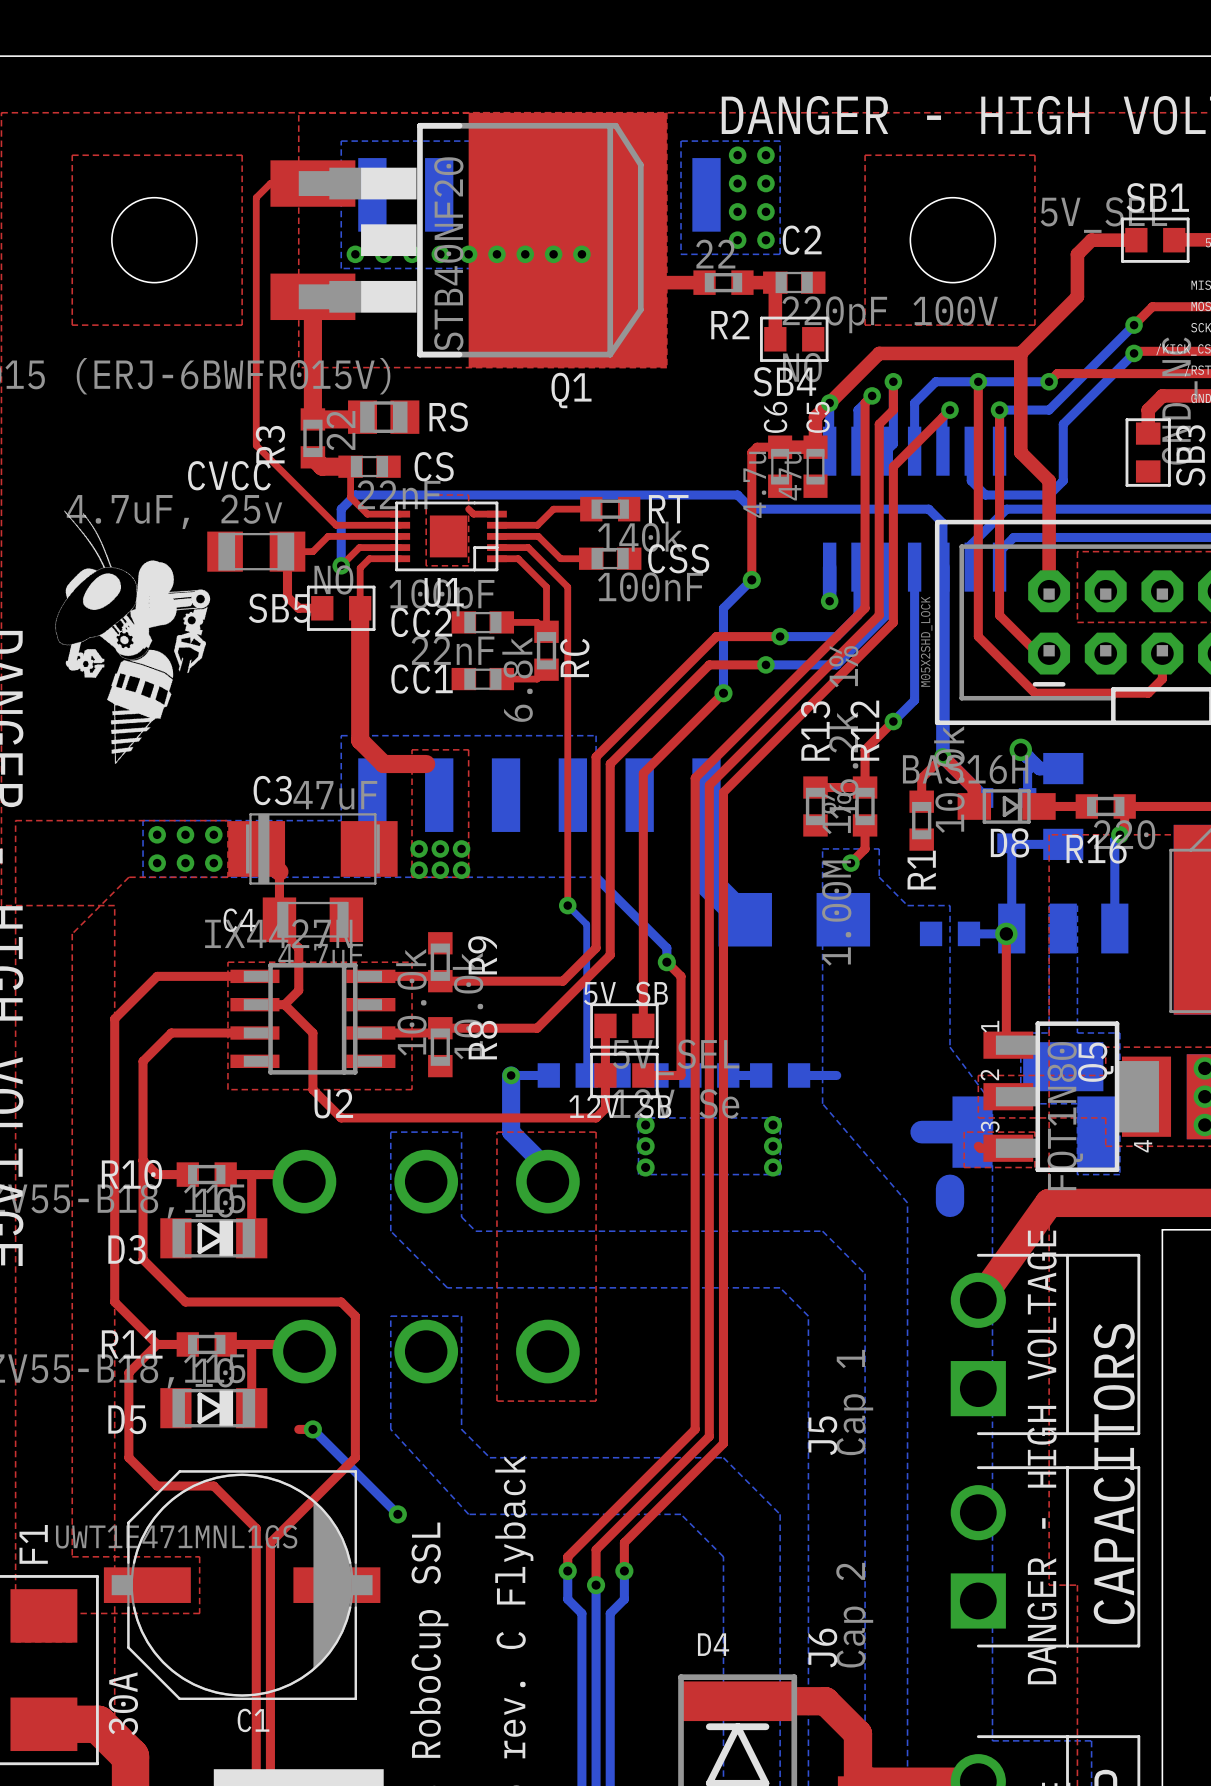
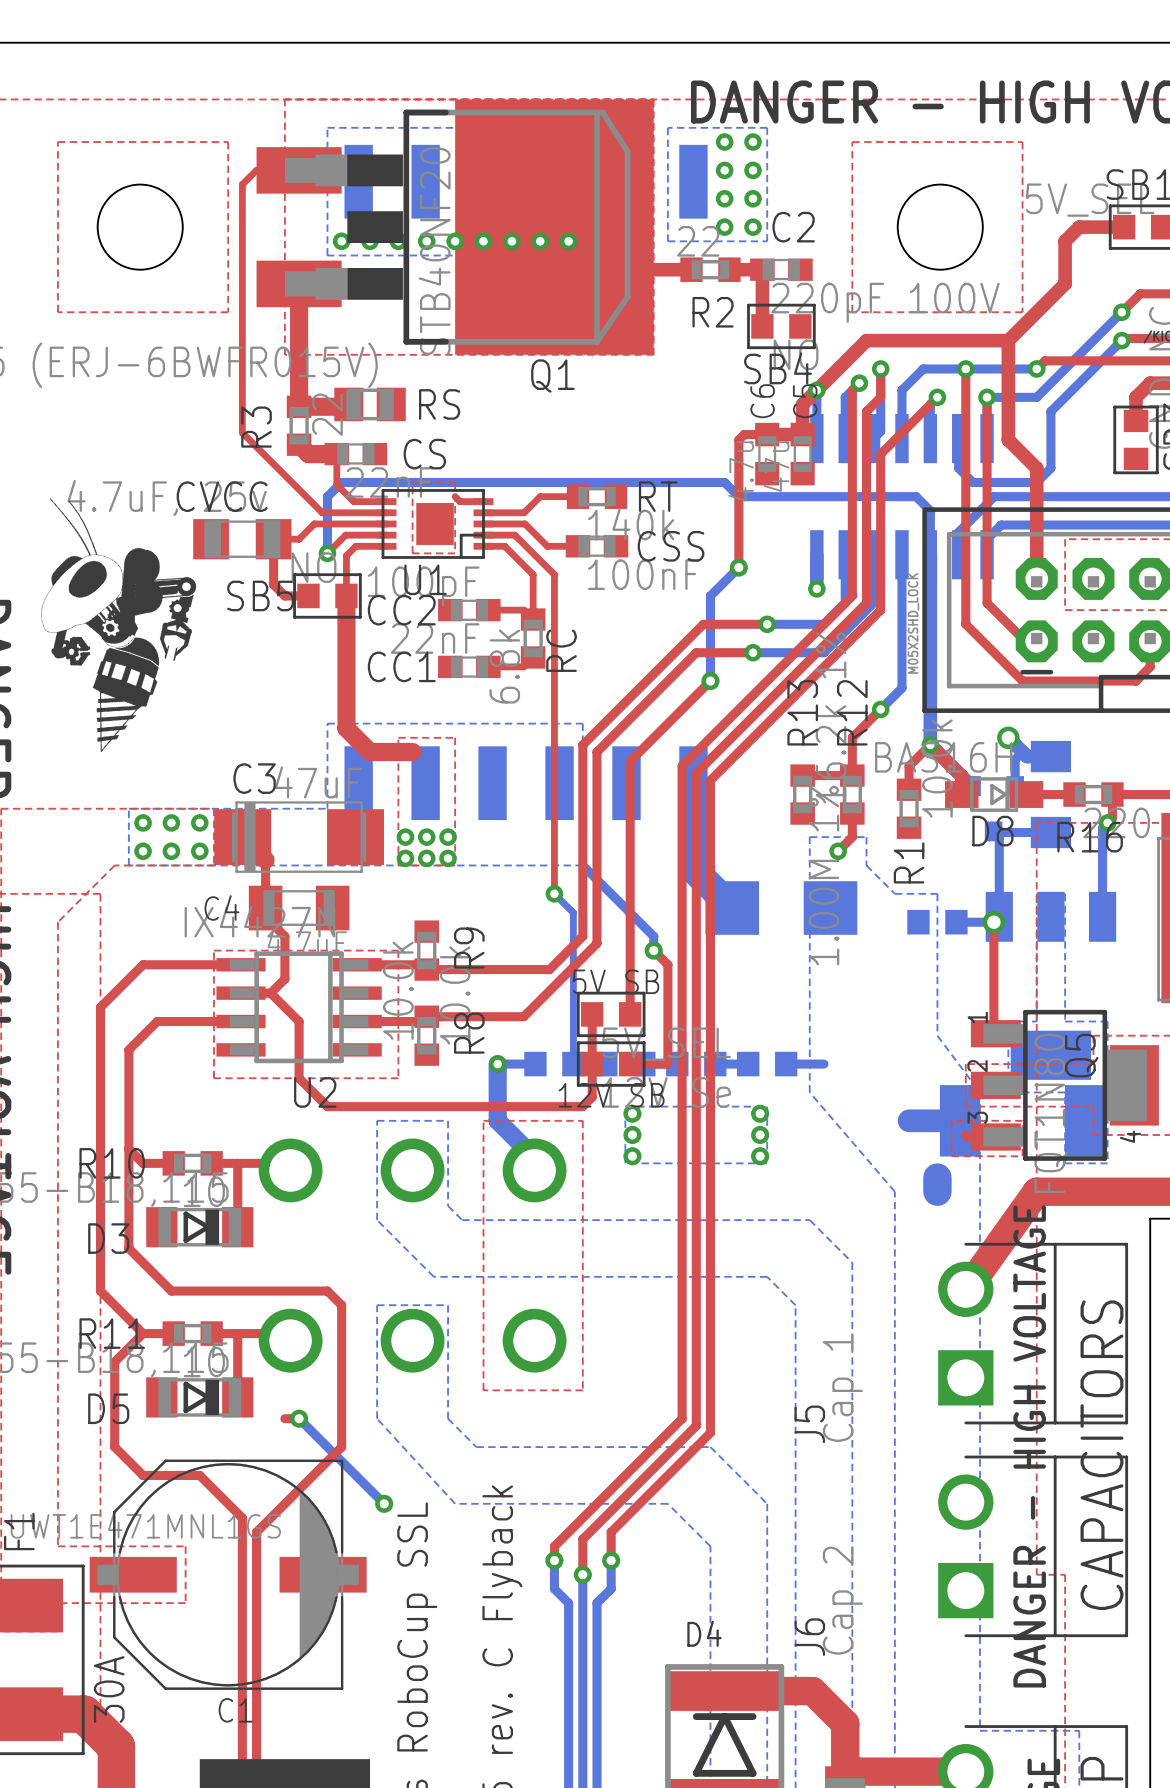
CVCC name position: CVCC (229, 475) -> CVCC (222, 496)

